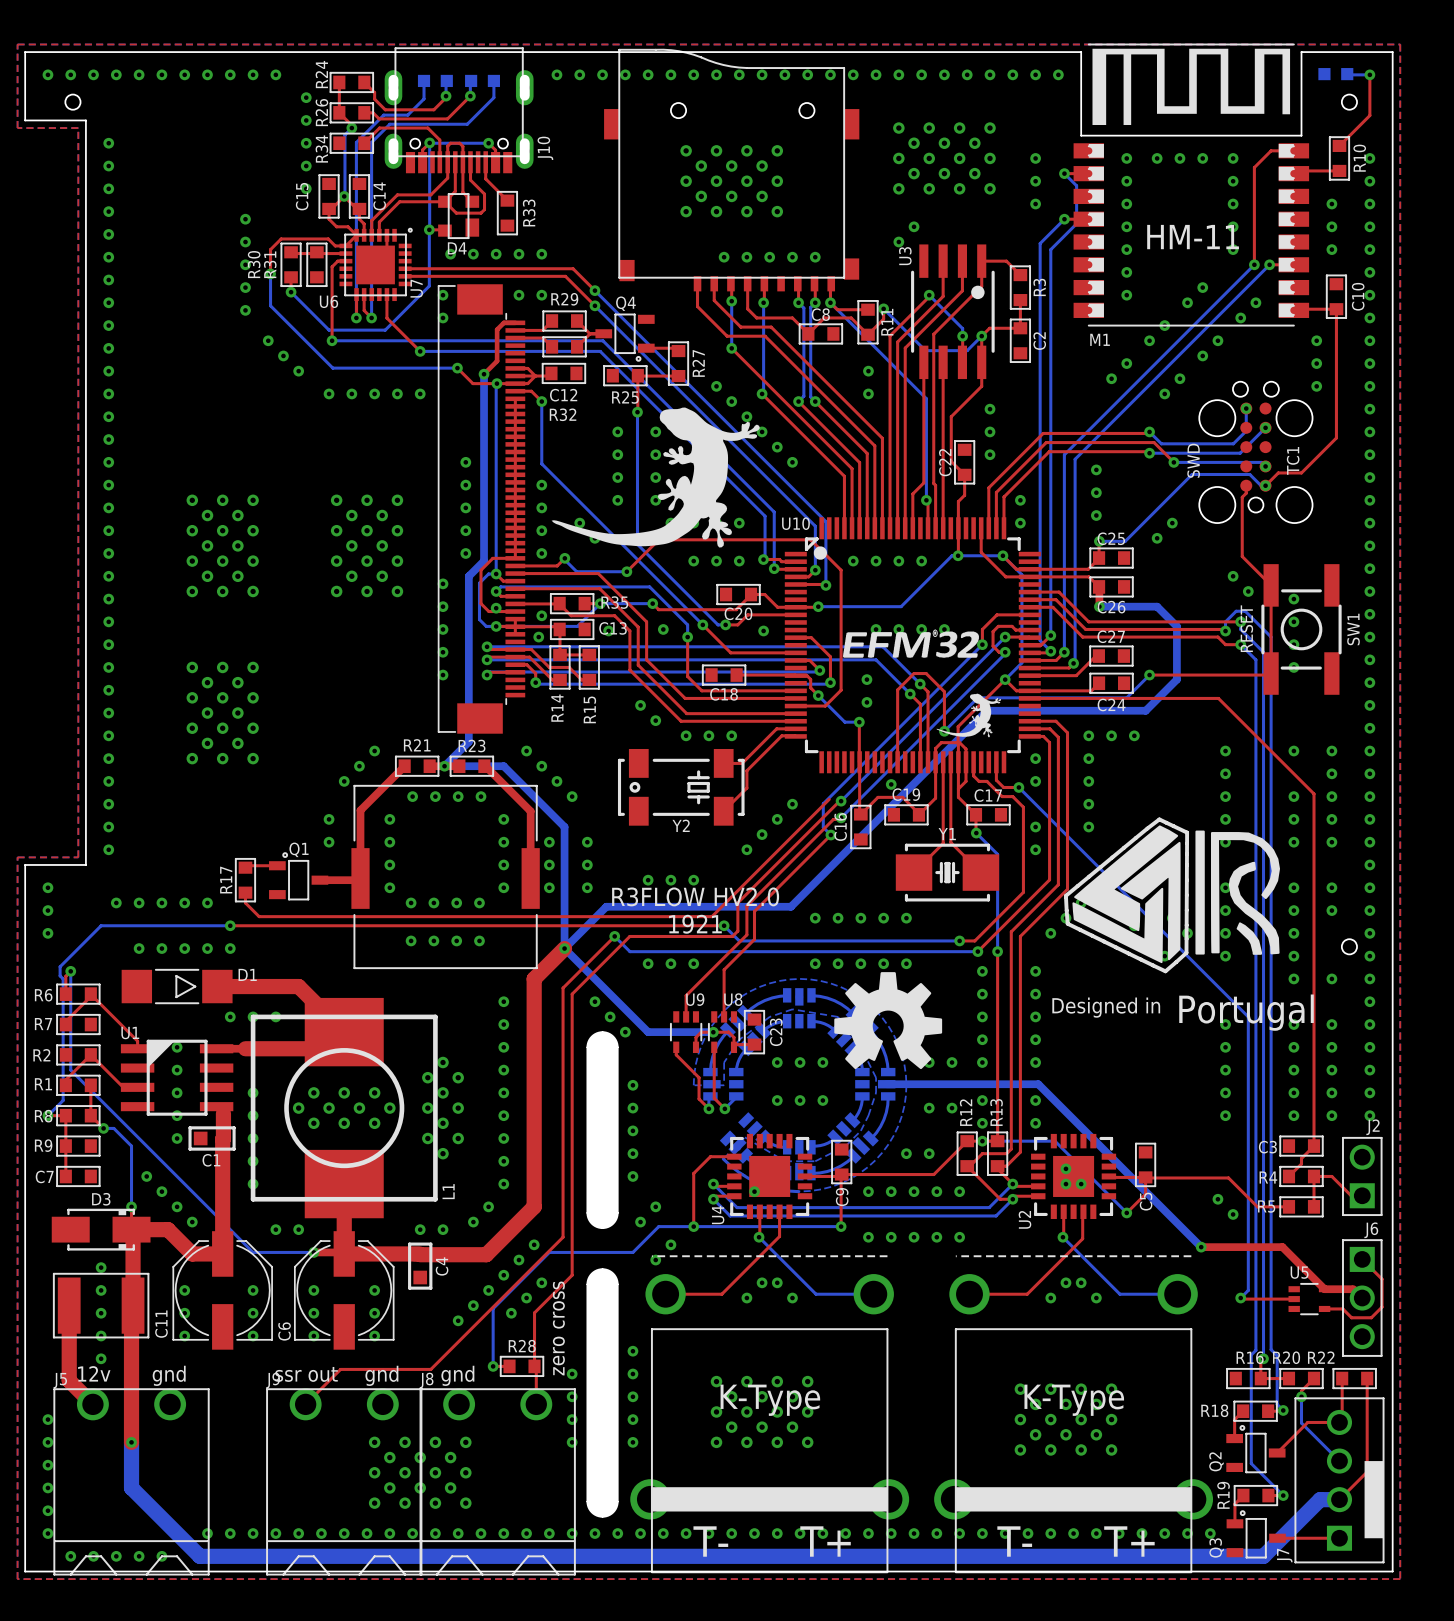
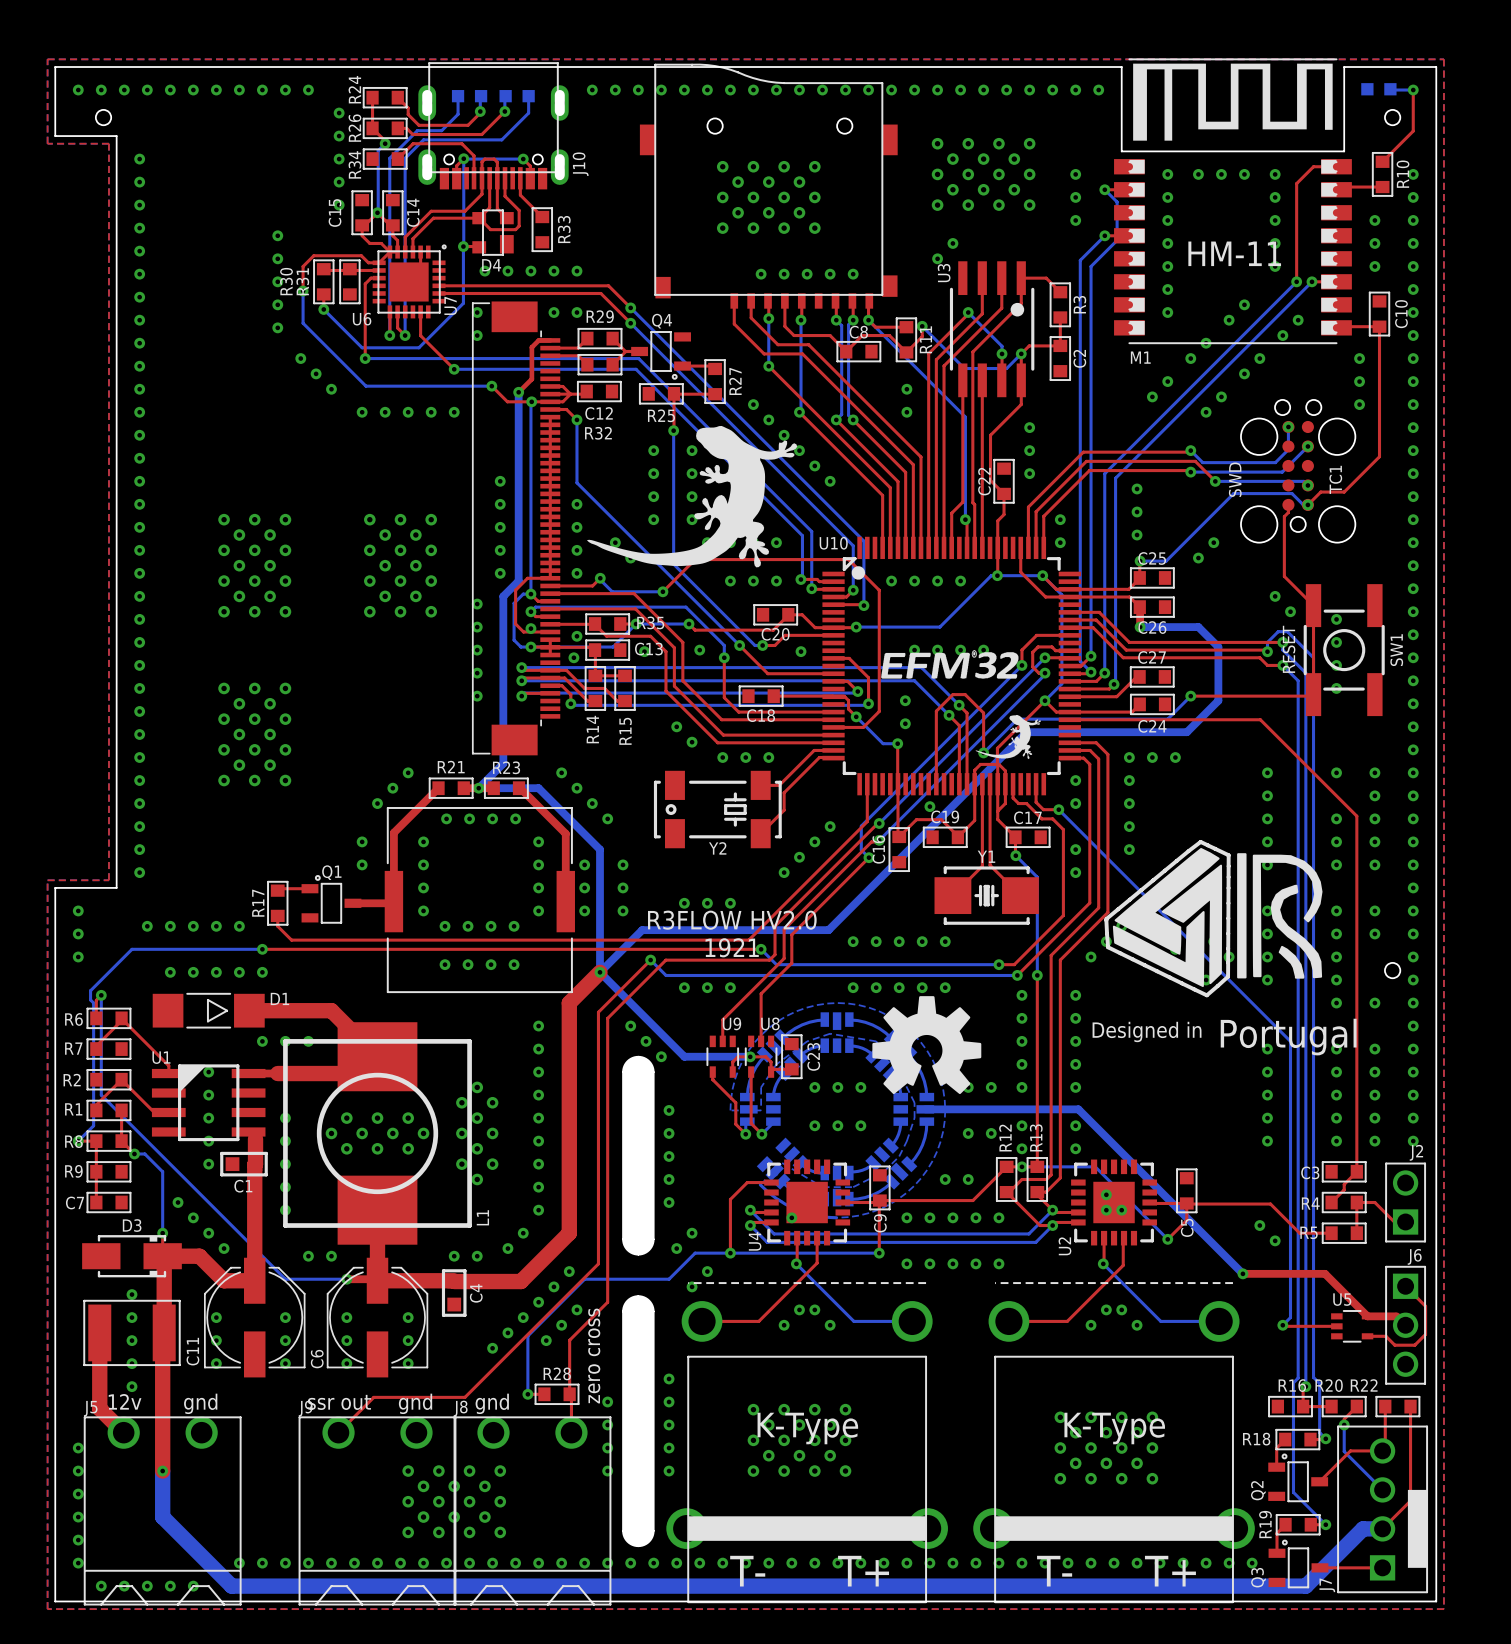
top track: none -> (867, 784) (867, 821)

